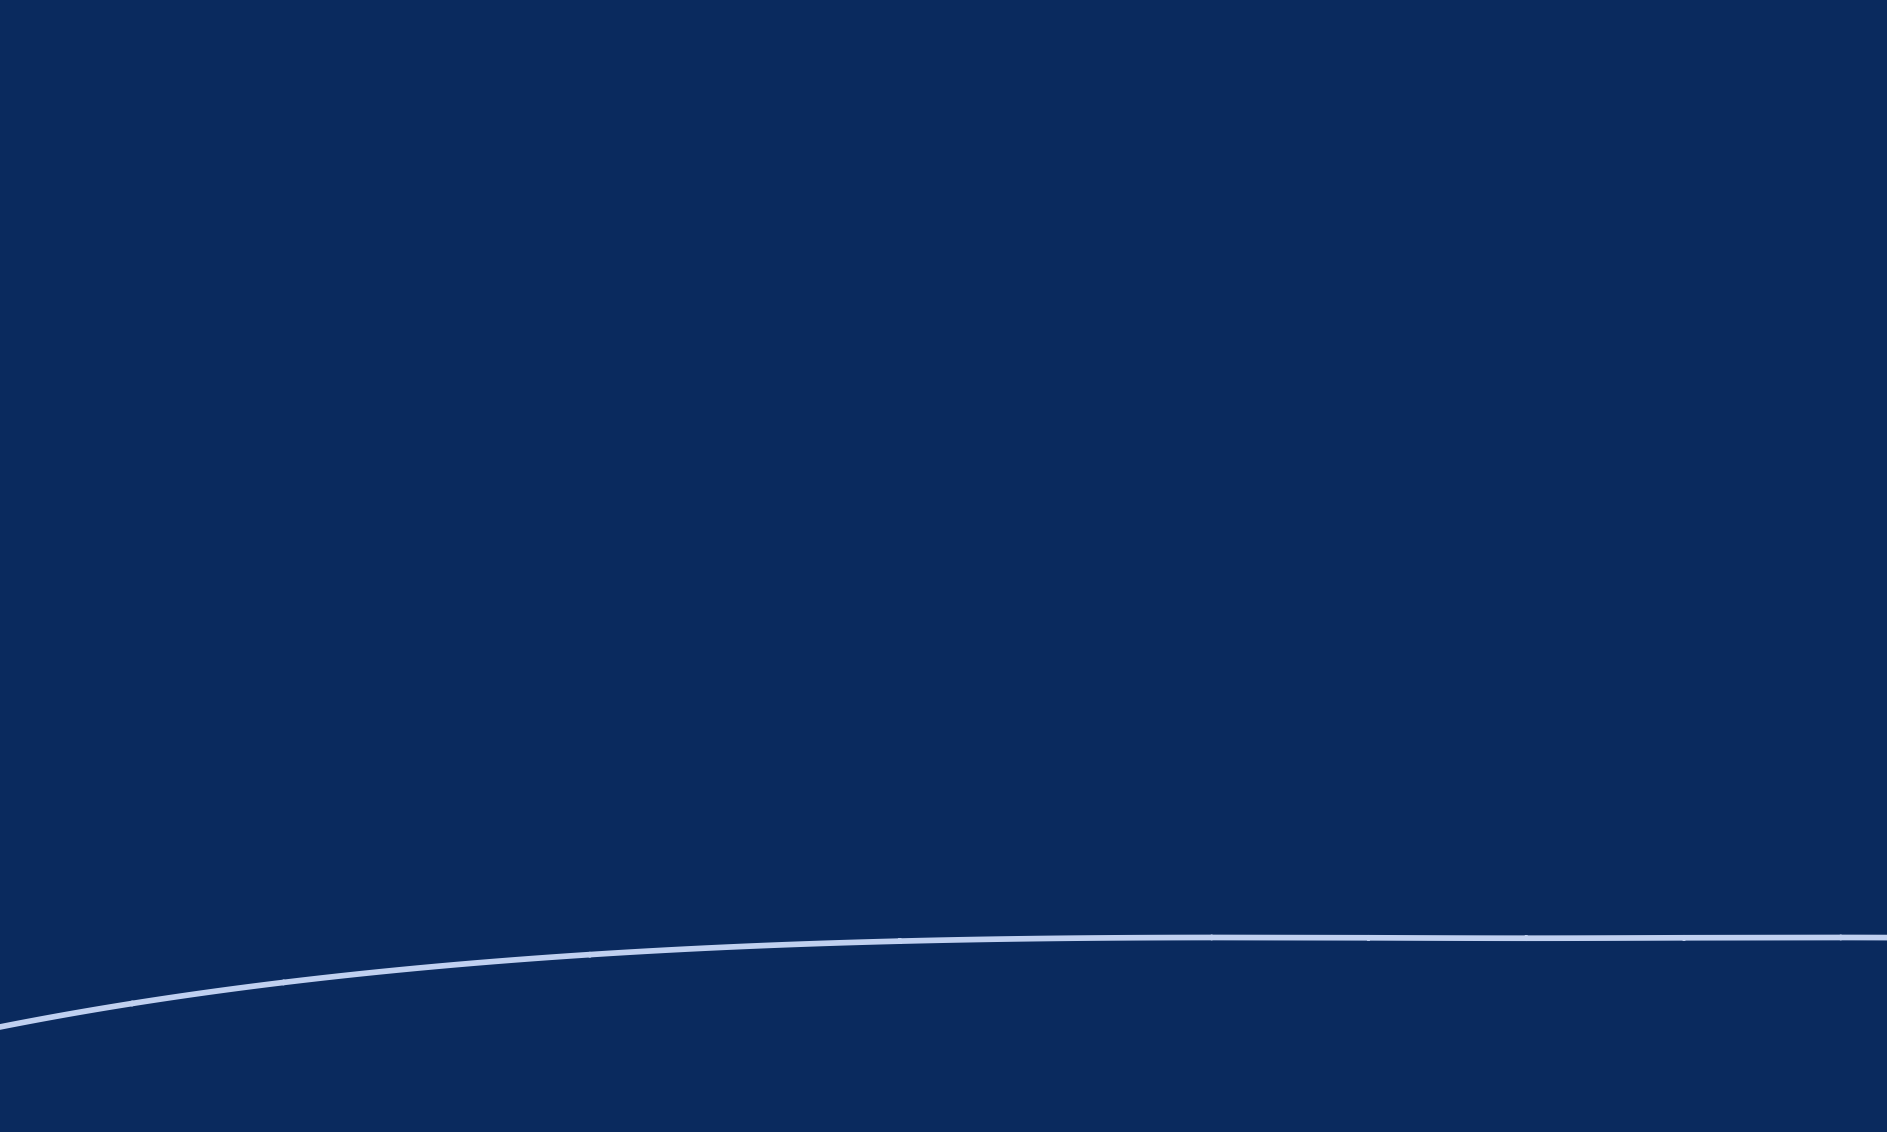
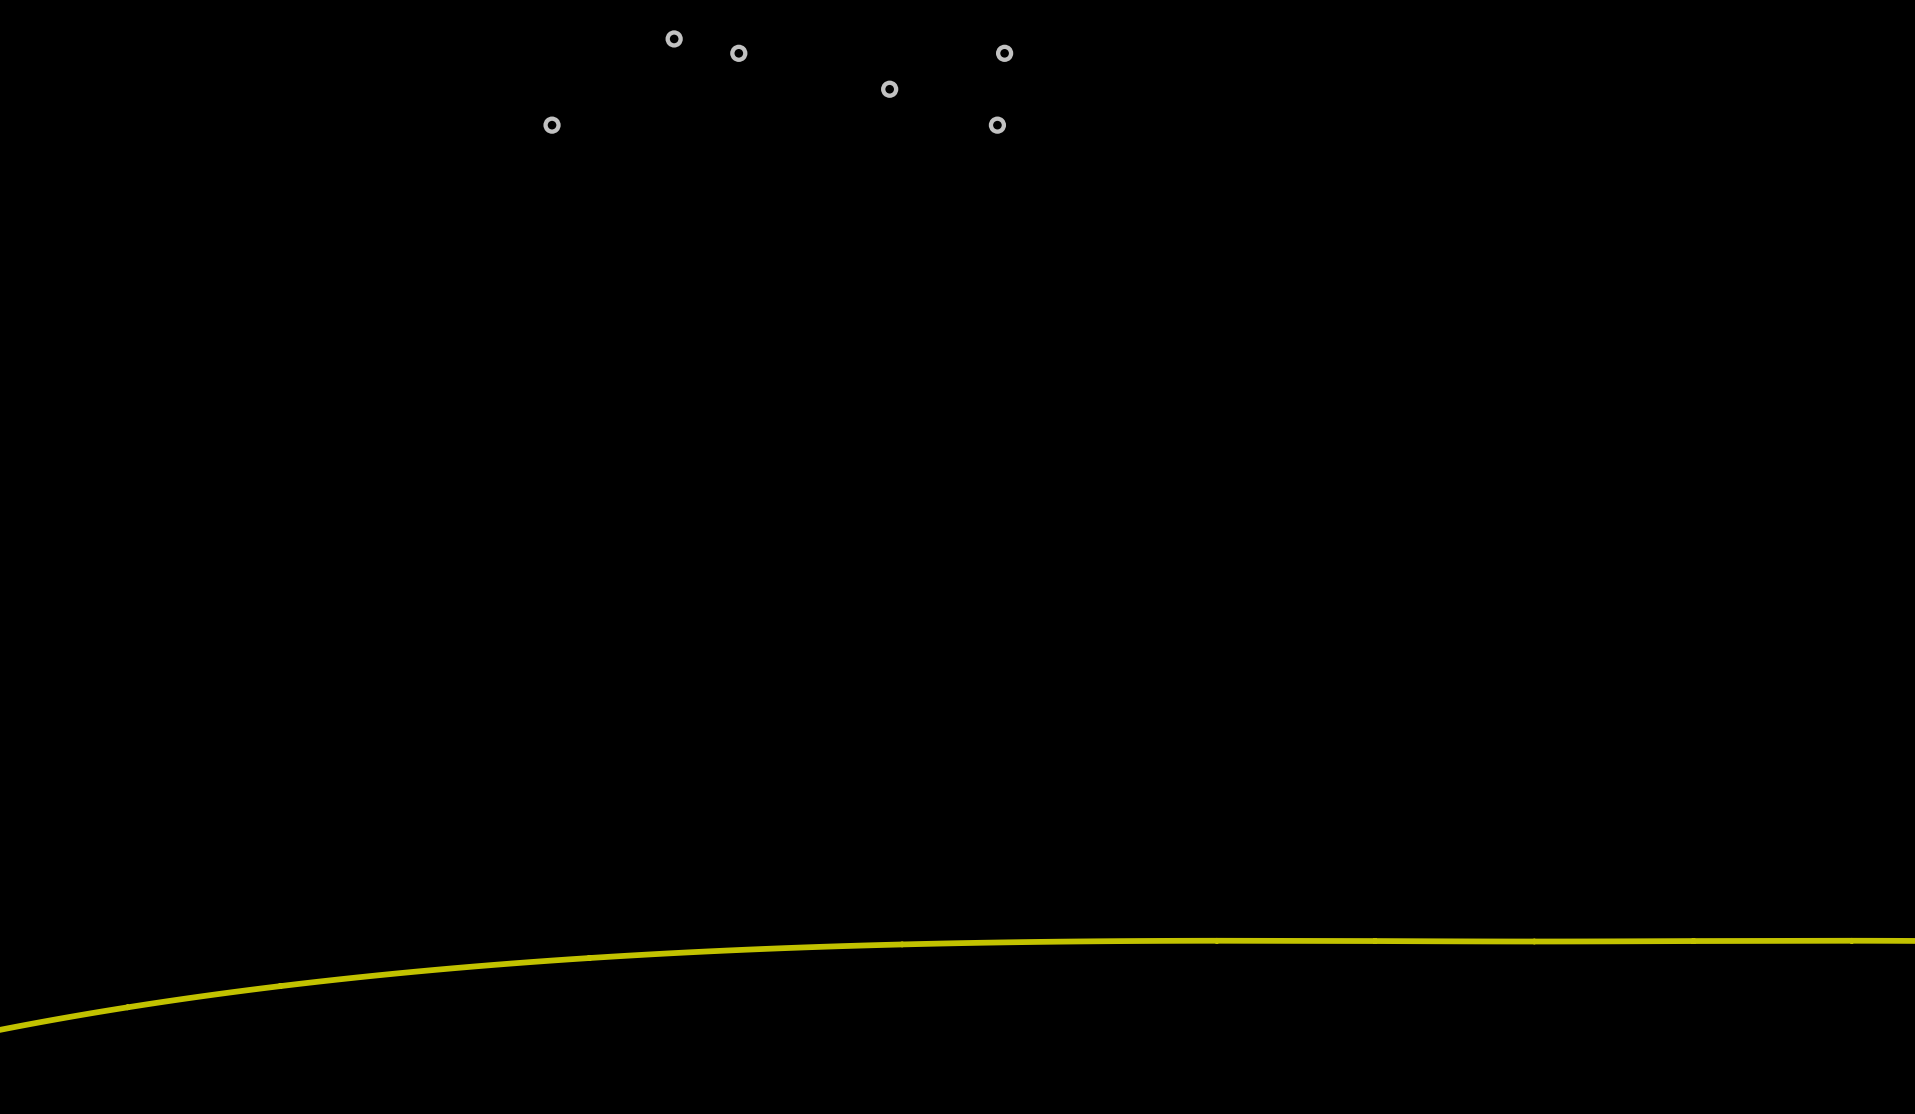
via: none -> (674, 38)
via: none -> (738, 53)
via: none -> (1004, 53)
via: none -> (889, 89)
via: none -> (552, 125)
via: none -> (997, 125)

